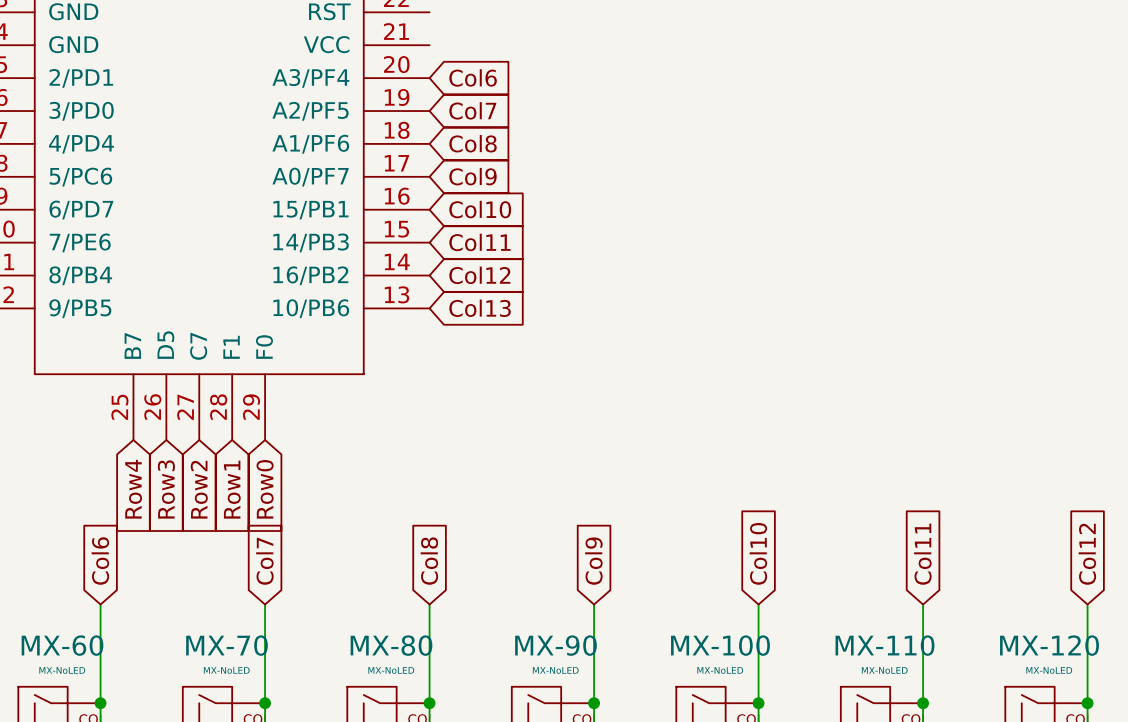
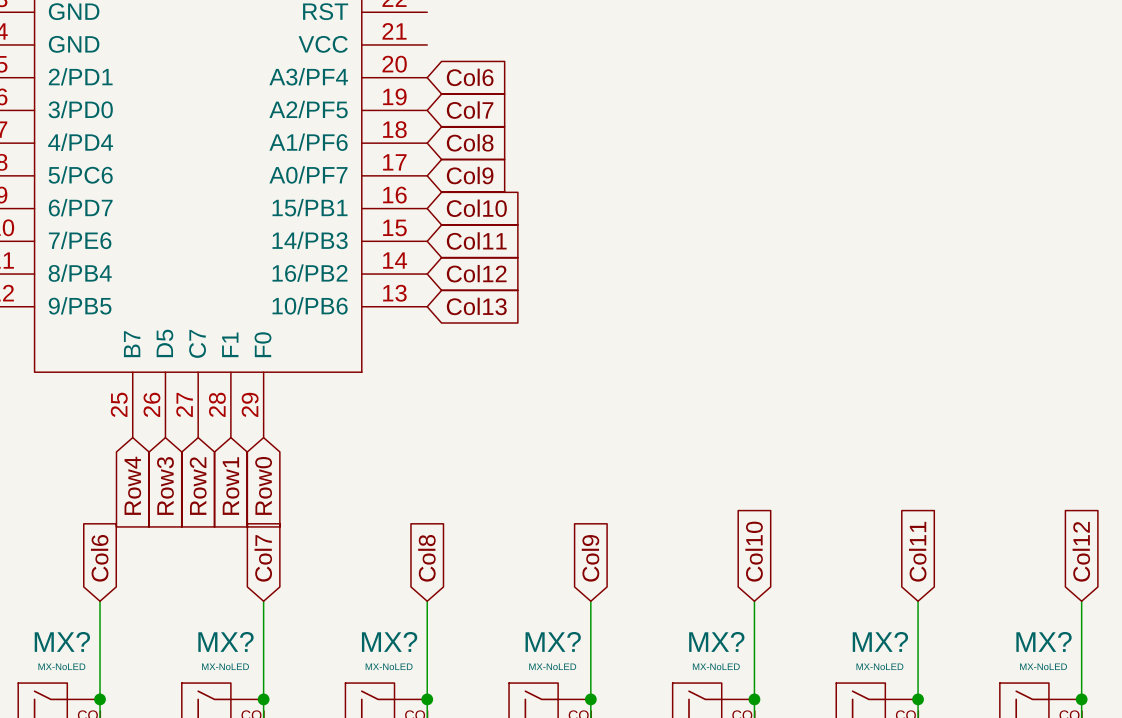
MX-60 name: MX-60 (62, 645) -> MX? (62, 641)
MX-70 name: MX-70 (226, 645) -> MX? (225, 641)
MX-80 name: MX-80 (391, 645) -> MX? (389, 641)
MX-90 name: MX-90 (556, 645) -> MX? (553, 641)
MX-100 name: MX-100 (720, 645) -> MX? (716, 641)
MX-110 name: MX-110 (885, 645) -> MX? (880, 641)
MX-120 name: MX-120 (1049, 645) -> MX? (1044, 641)

